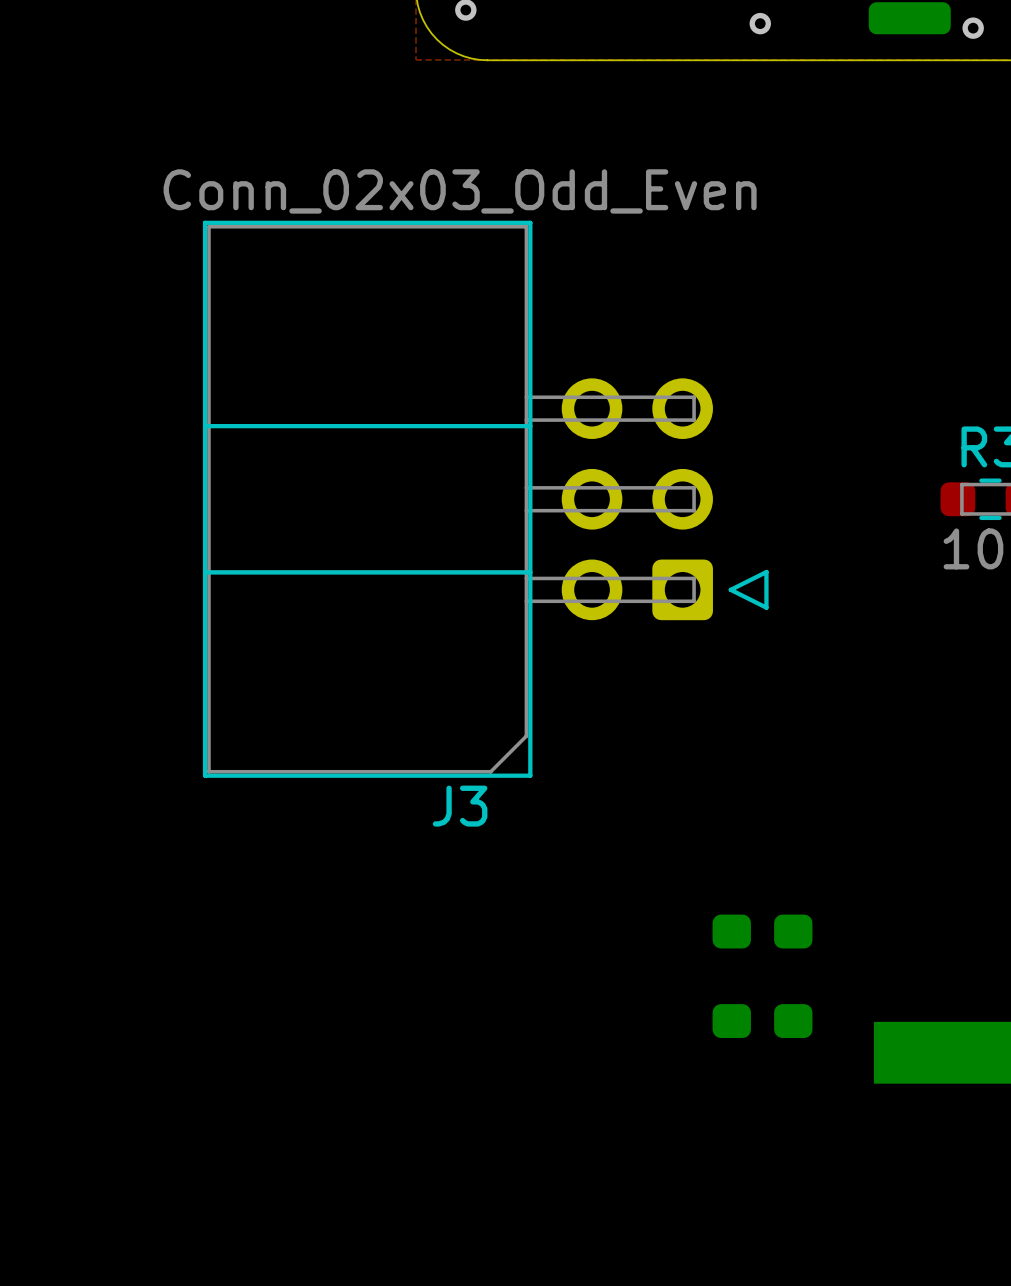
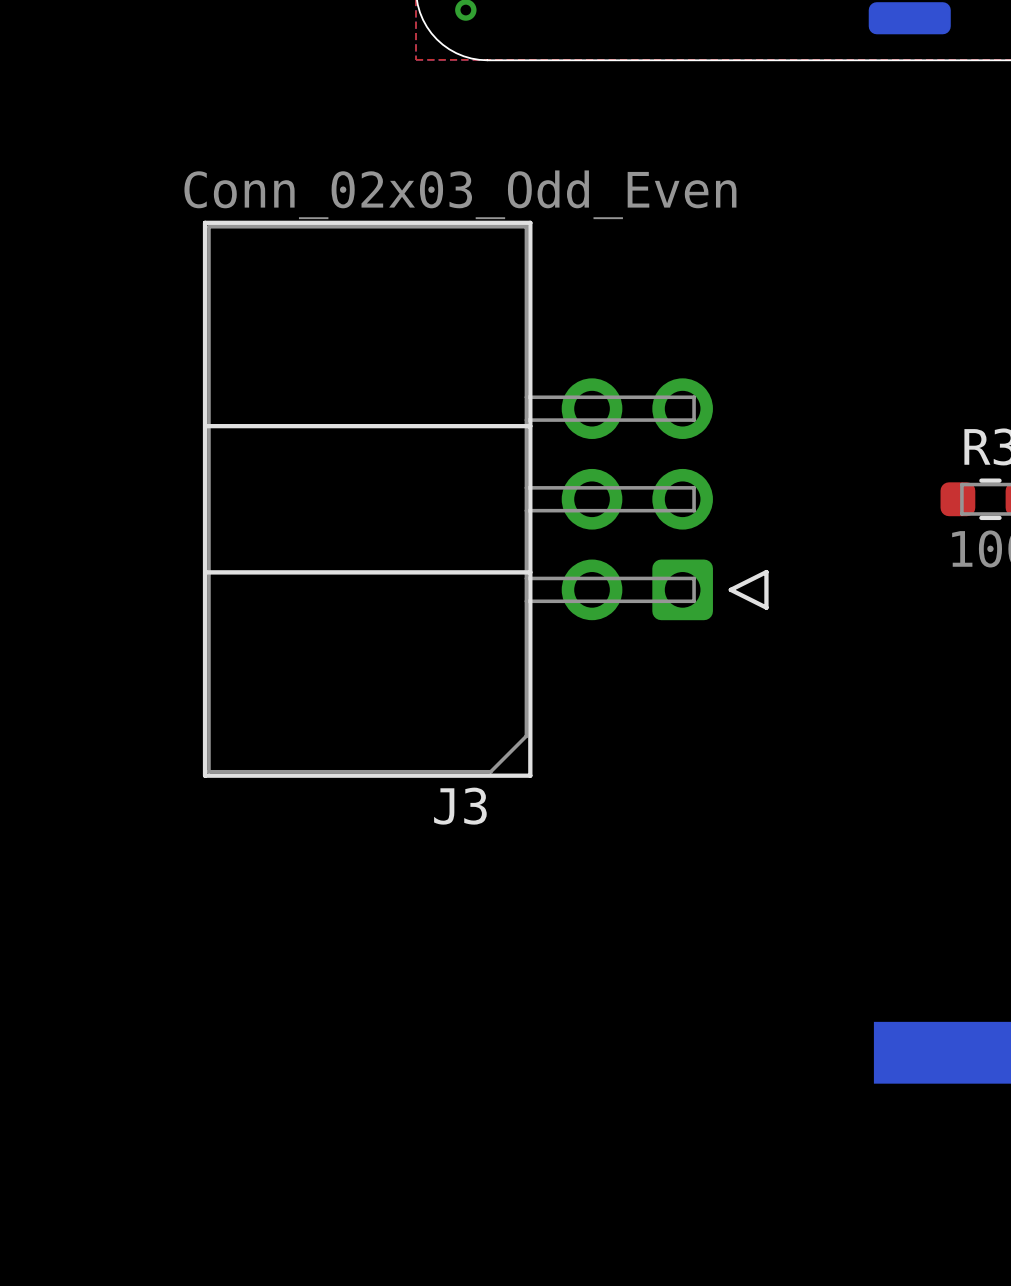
via: (760, 23) -> none
via: (973, 28) -> none
part: (762, 931) -> none
part: (762, 1021) -> none

